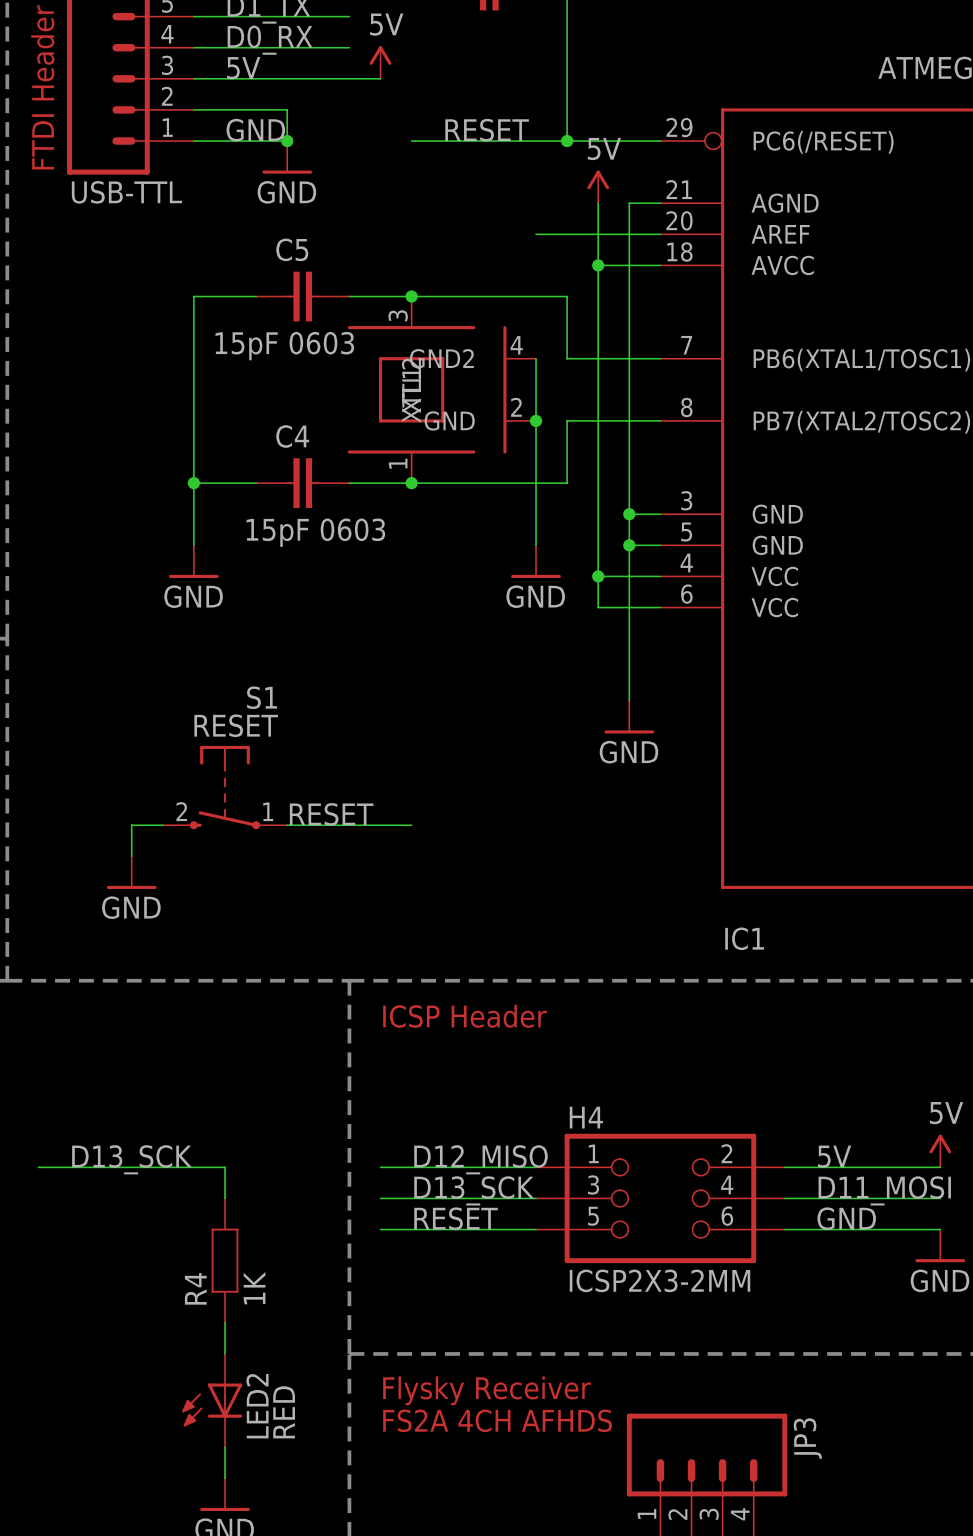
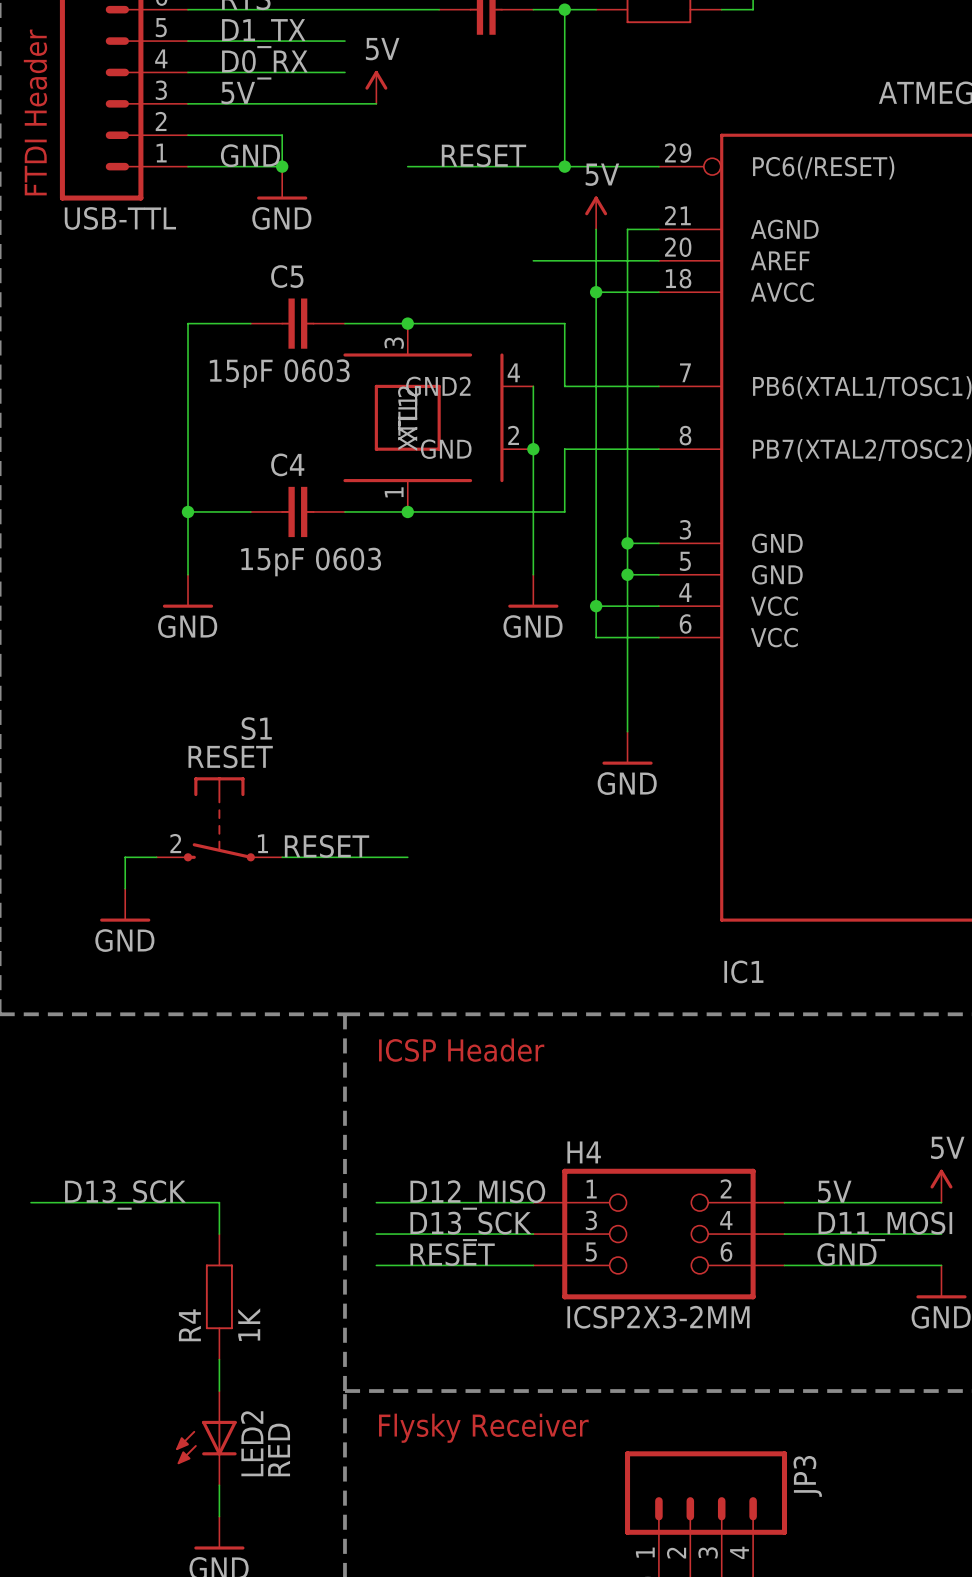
text: FS2A 4CH AFHDS (497, 1420) -> none

